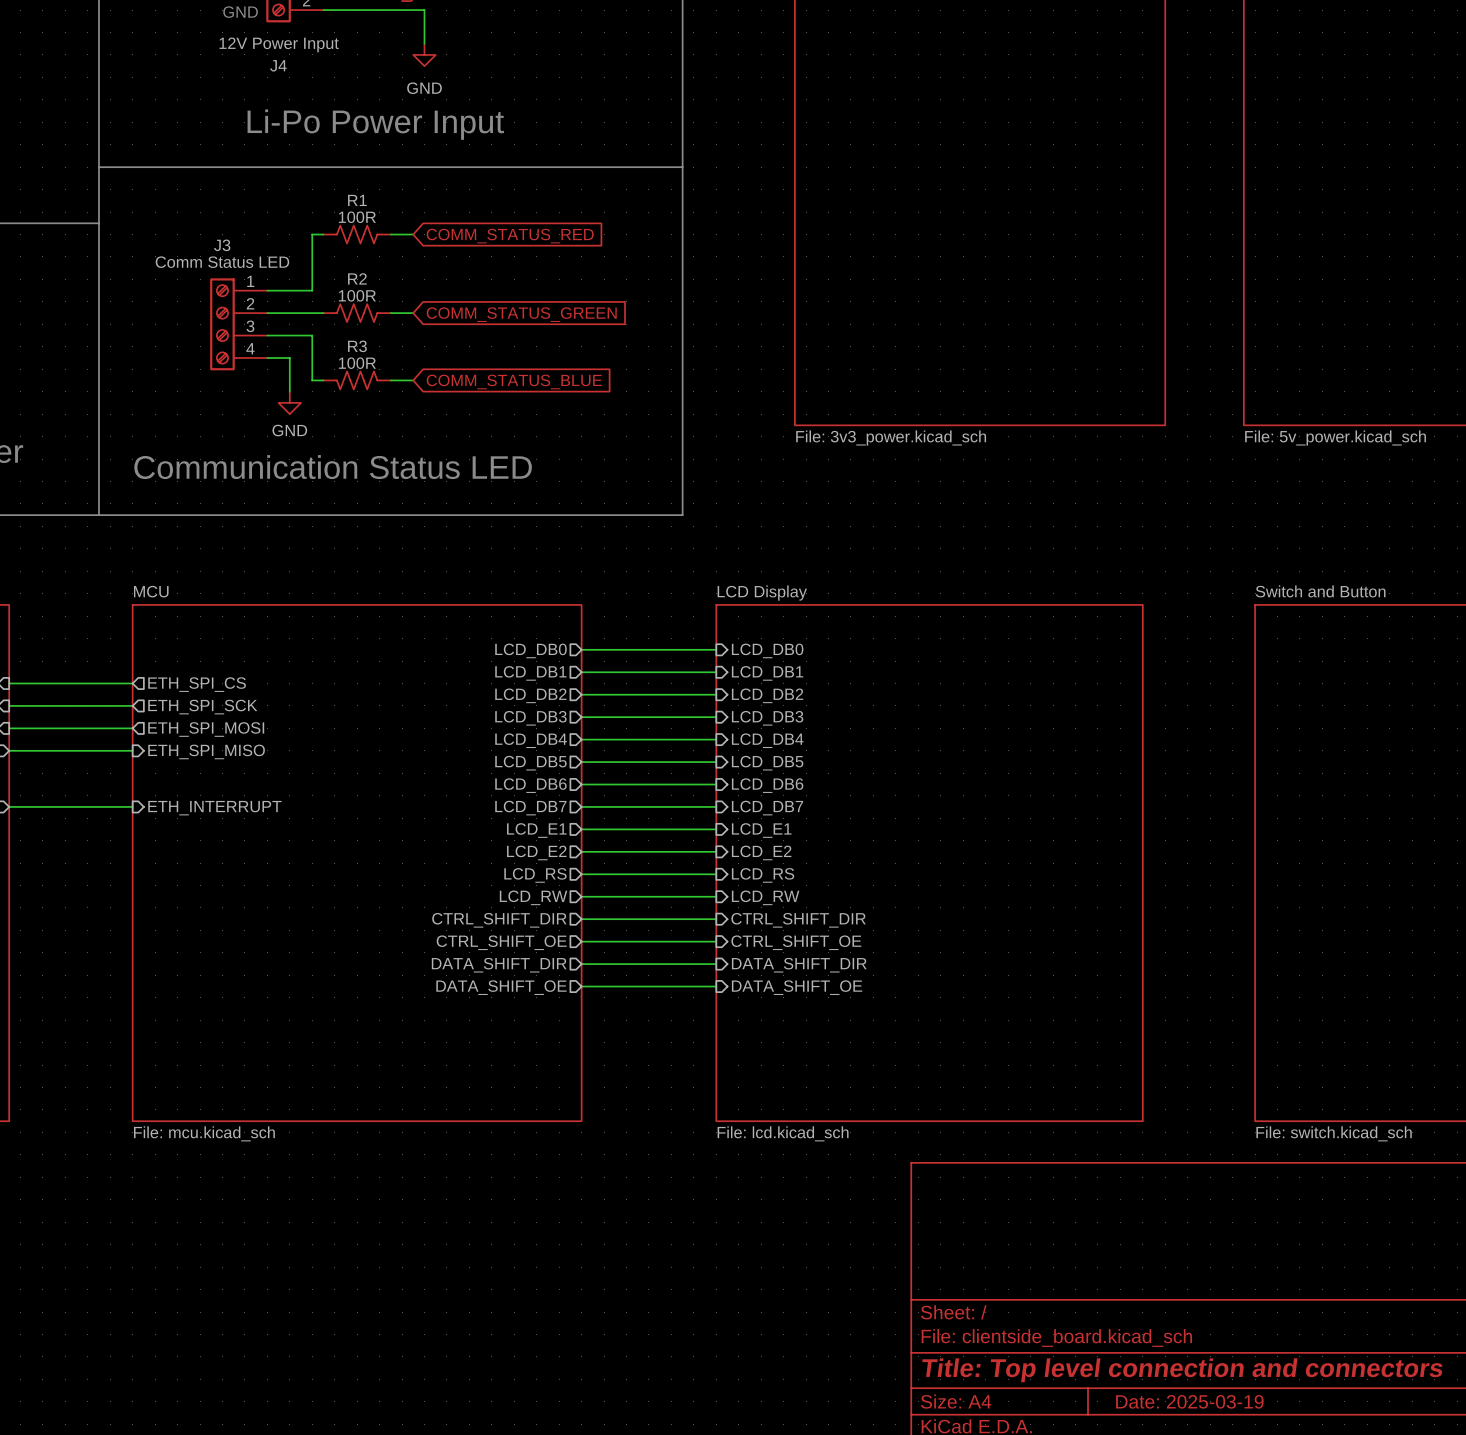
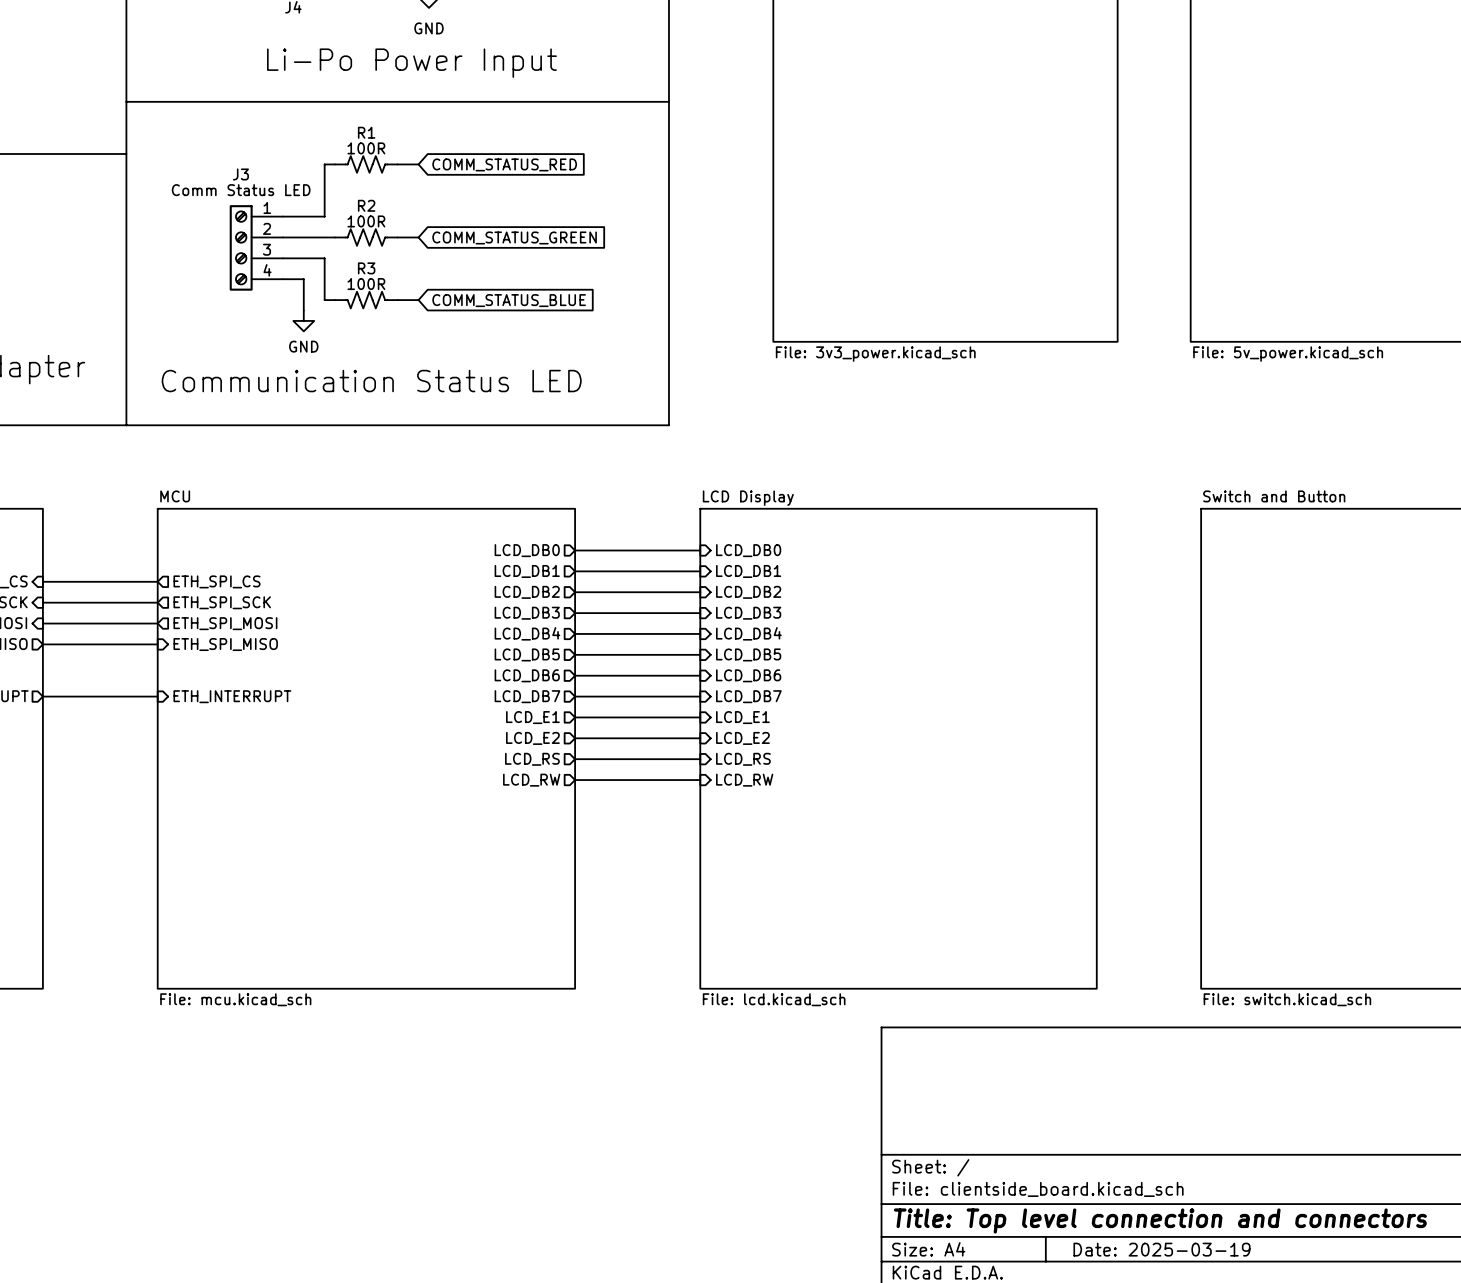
wire: (581, 919) (716, 919) -> none
sheet pin: CTRL_SHIFT_DIR (499, 920) -> none
sheet pin: CTRL_SHIFT_DIR (798, 920) -> none
wire: (581, 941) (716, 941) -> none
sheet pin: CTRL_SHIFT_OE (501, 942) -> none
sheet pin: CTRL_SHIFT_OE (796, 942) -> none
wire: (581, 964) (716, 964) -> none
sheet pin: DATA_SHIFT_DIR (499, 965) -> none
sheet pin: DATA_SHIFT_DIR (799, 965) -> none
wire: (581, 986) (716, 986) -> none
sheet pin: DATA_SHIFT_OE (501, 987) -> none
sheet pin: DATA_SHIFT_OE (797, 987) -> none

